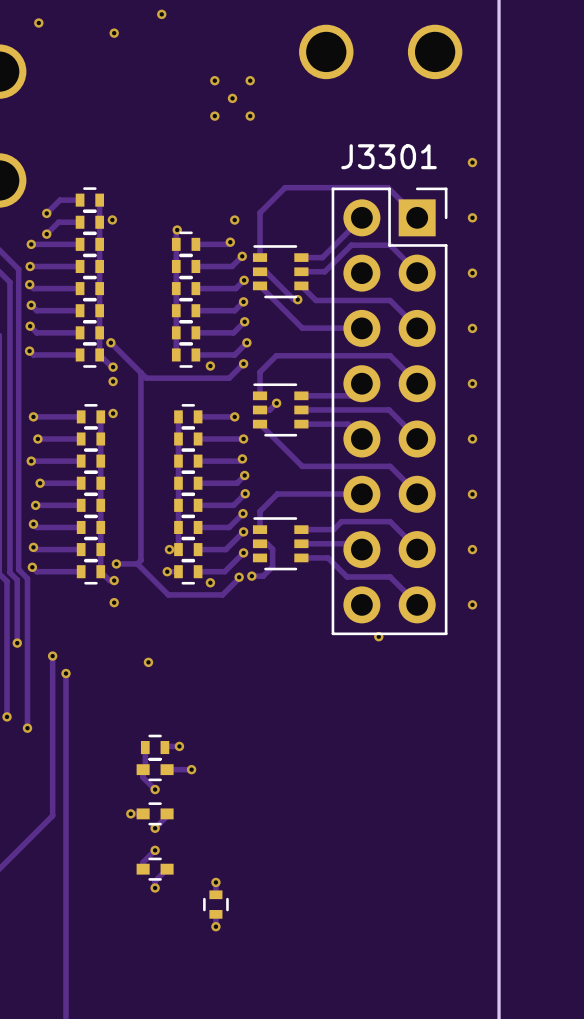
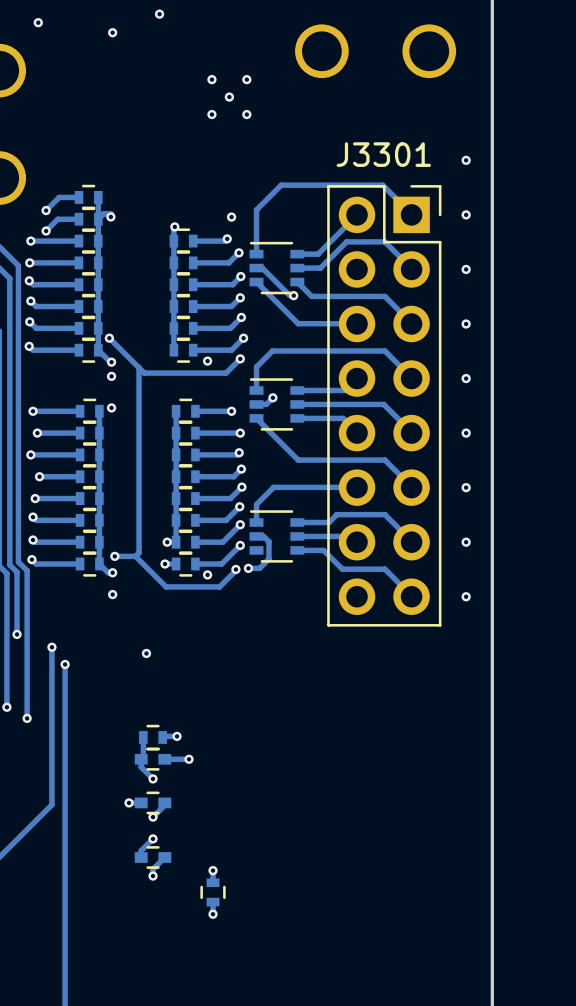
track: none -> (111, 213) (103, 213) (98, 219)
via: (378, 636) -> none

